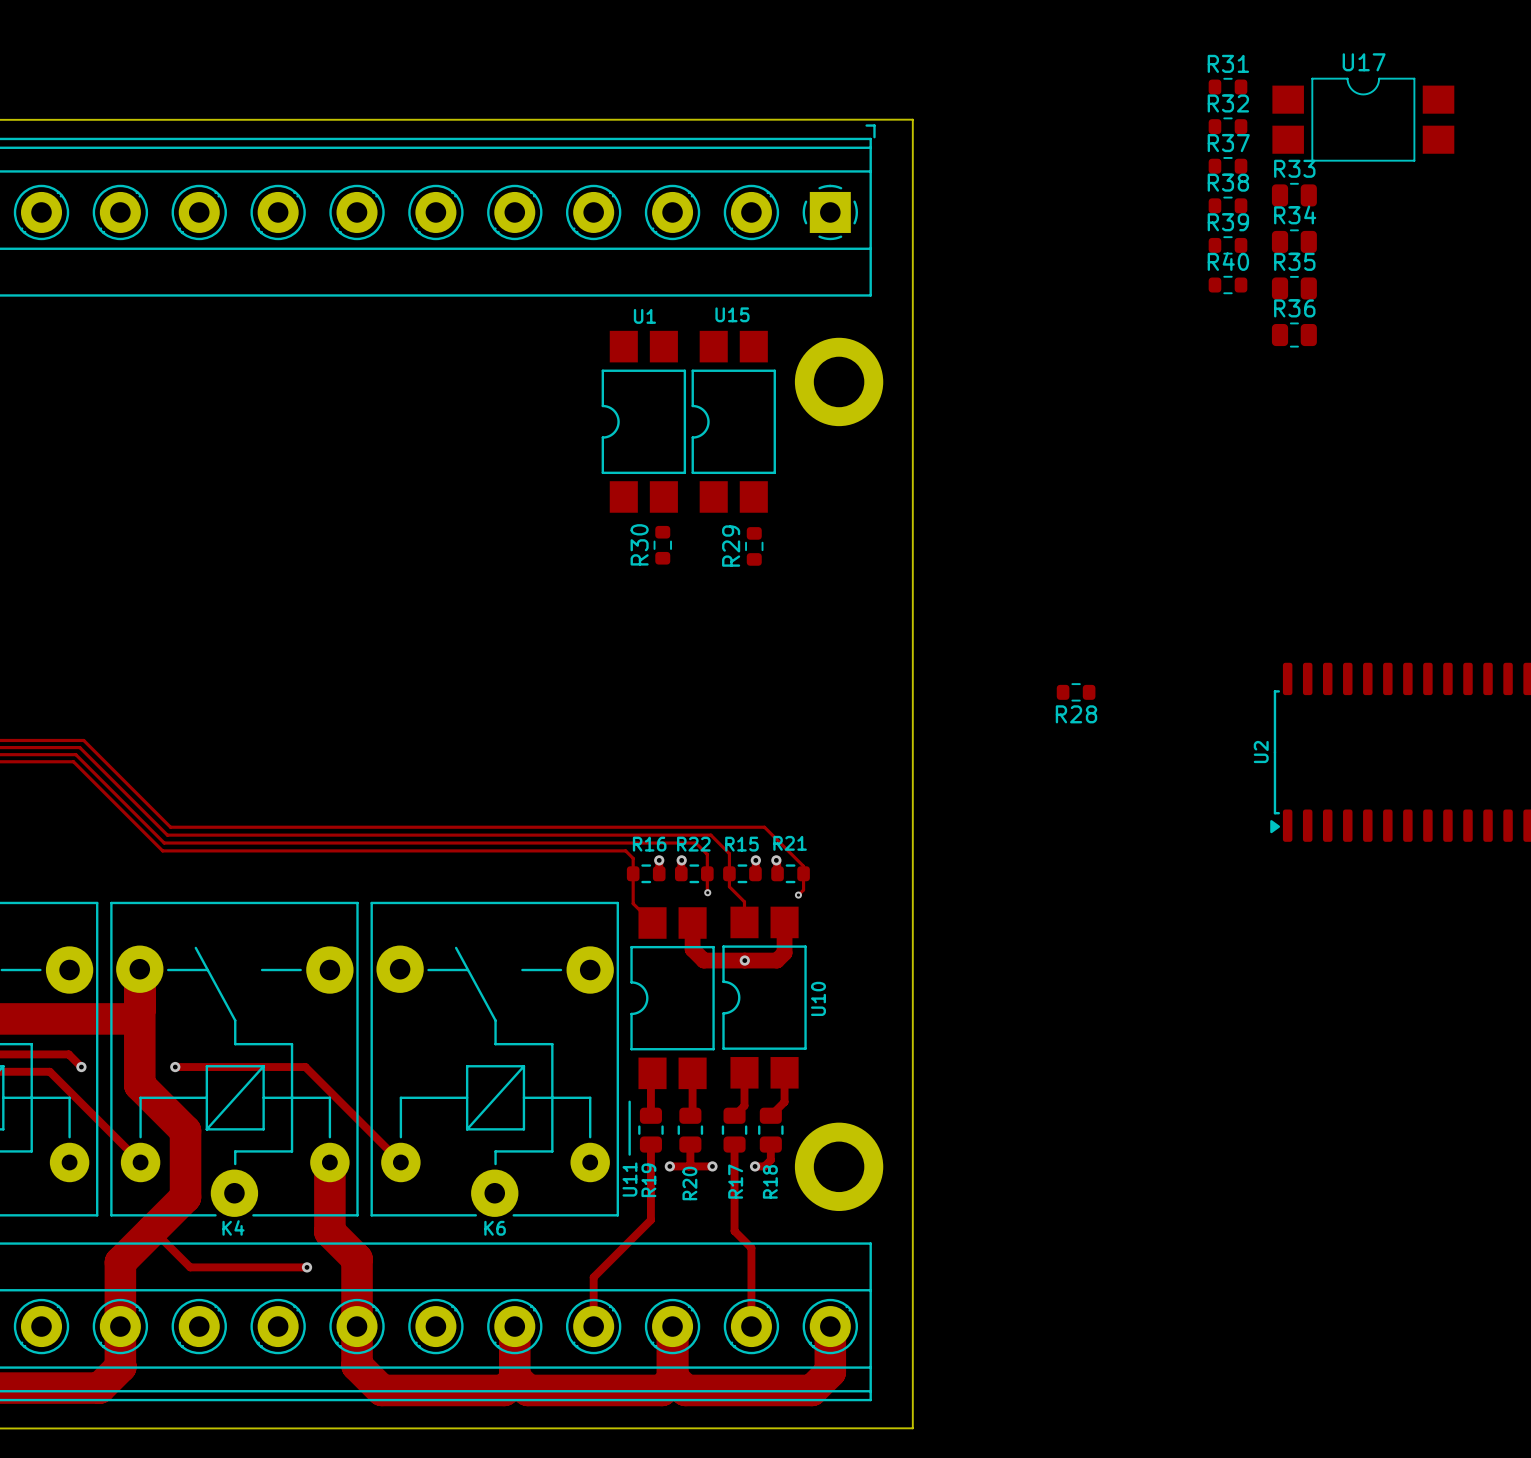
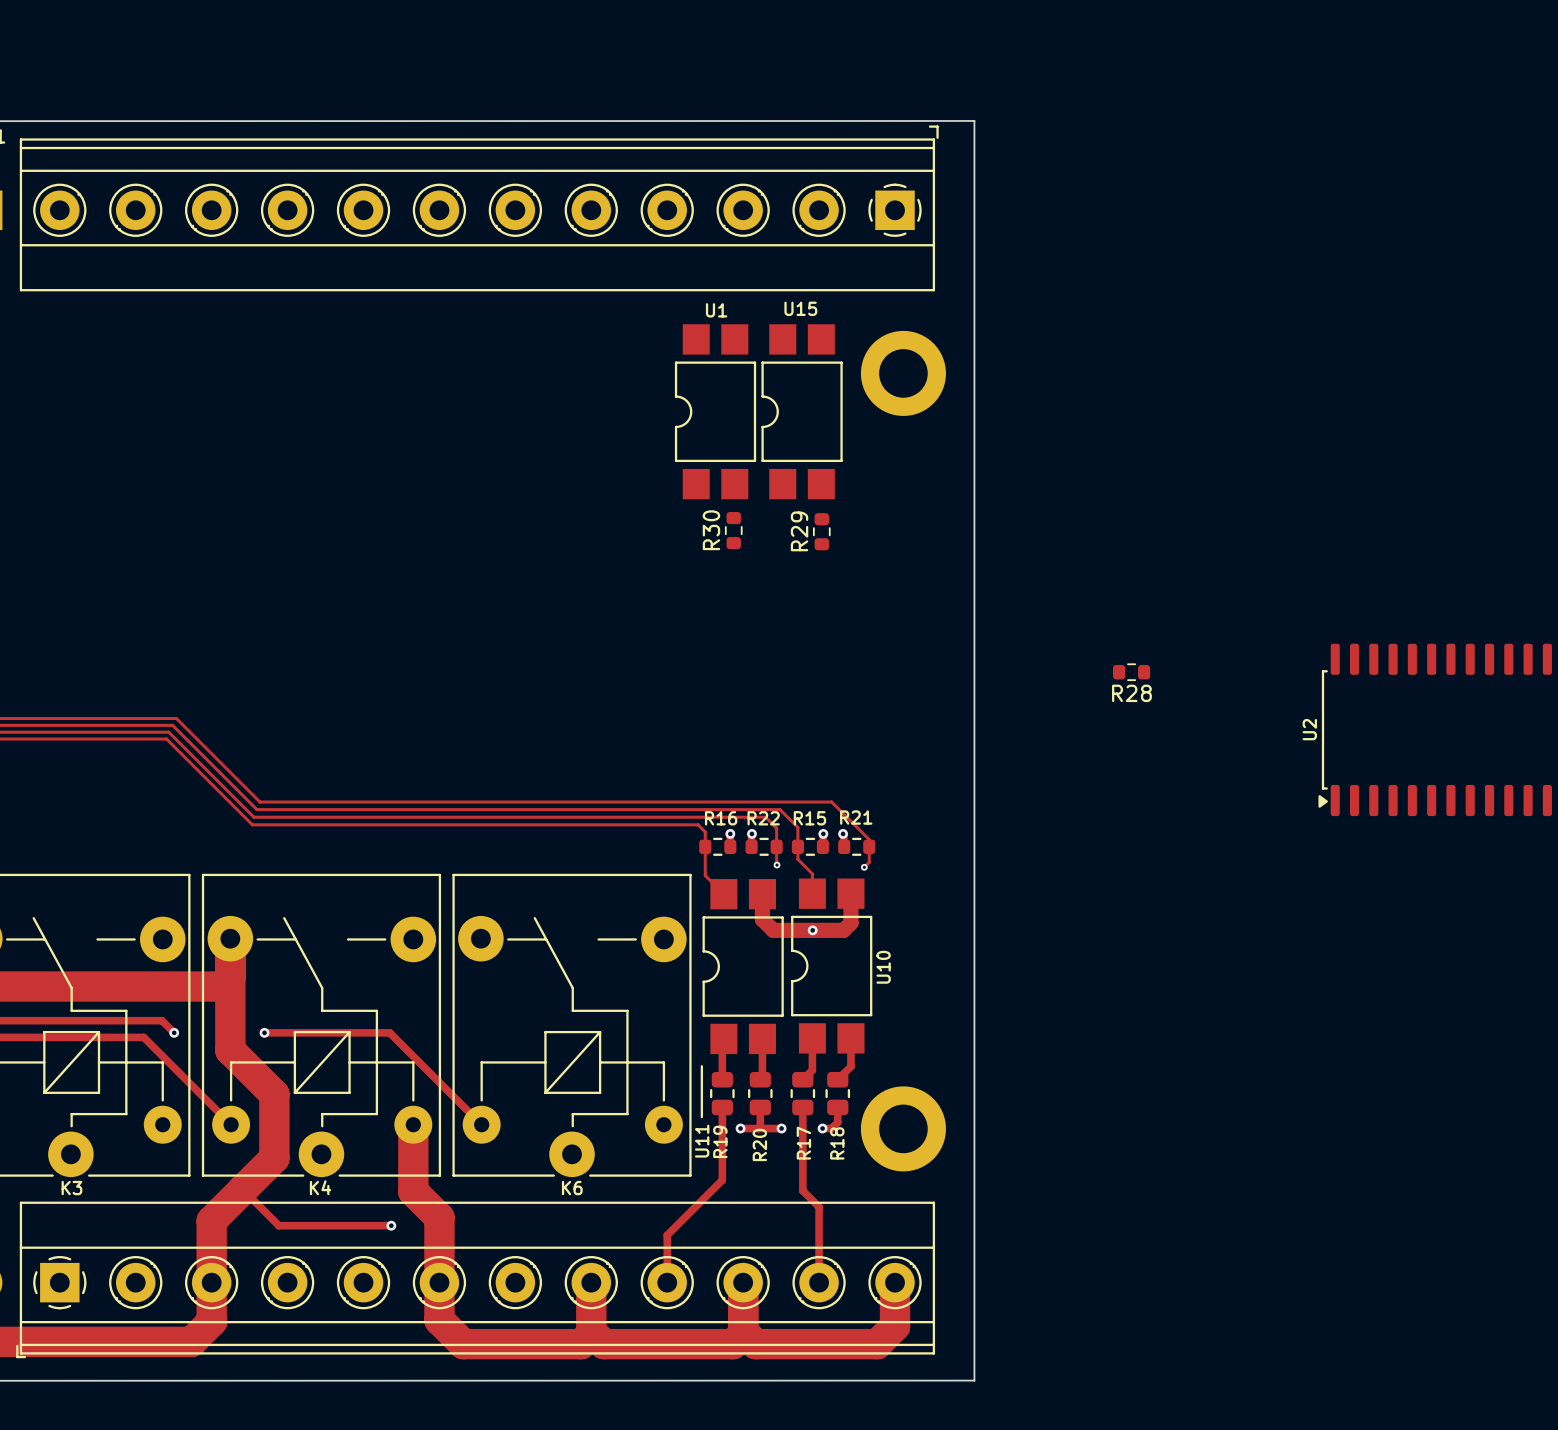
R31: (1227, 87) -> none
U17: (1363, 119) -> none
R32: (1227, 126) -> none
R37: (1227, 166) -> none
R33: (1294, 195) -> none
R38: (1227, 205) -> none
R34: (1294, 241) -> none
R39: (1227, 245) -> none
R40: (1227, 285) -> none
R35: (1294, 288) -> none
R36: (1294, 335) -> none

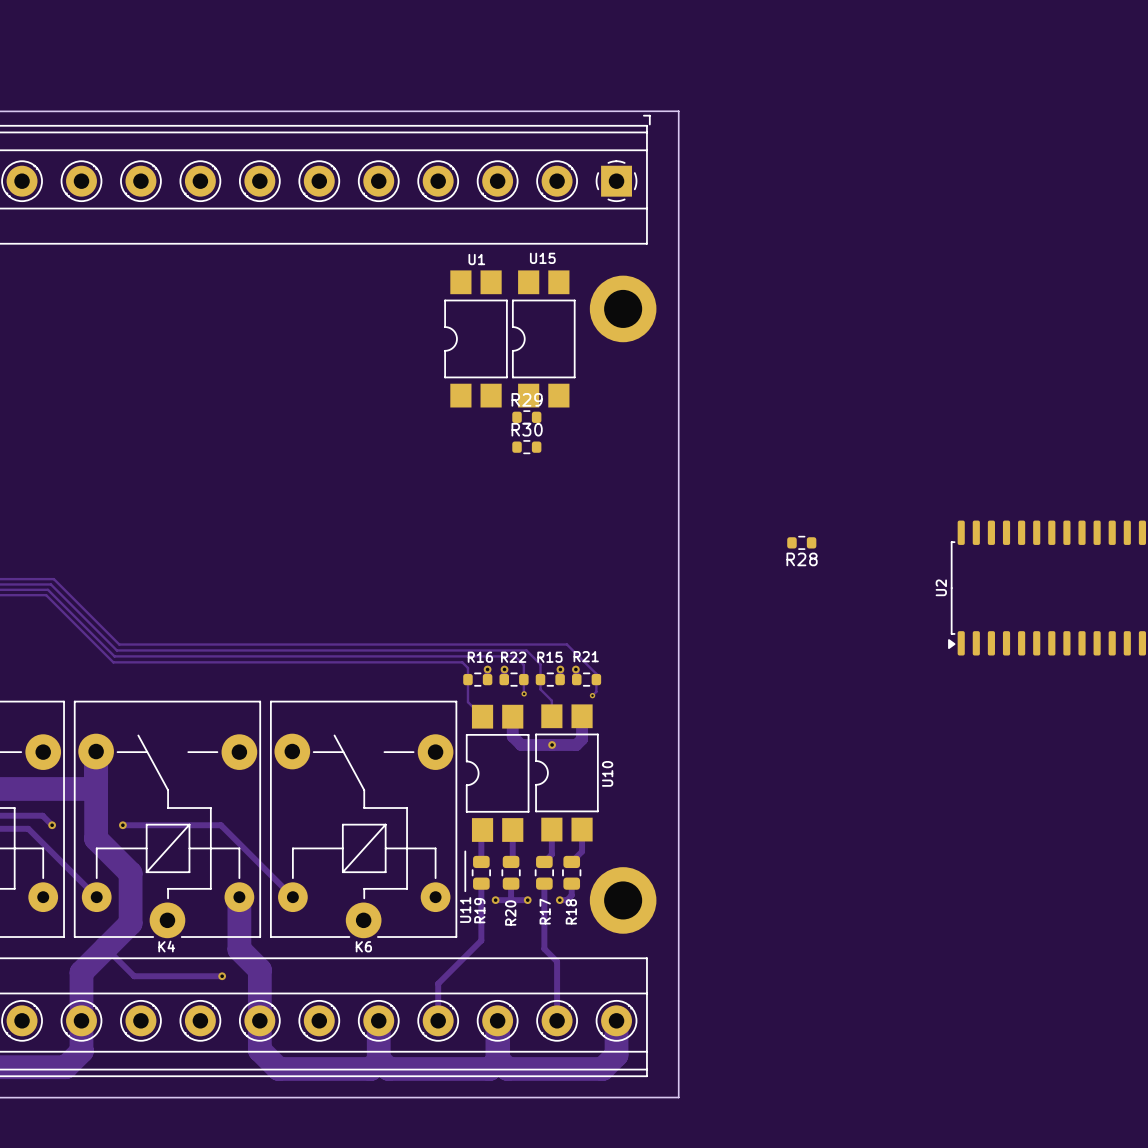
R30 rotation: 0° (733, 530) -> 90° clockwise (526, 447)
R30 position: (733, 530) -> (526, 447)
R29 rotation: 0° (821, 531) -> 90° clockwise (526, 417)
R29 position: (821, 531) -> (526, 417)

